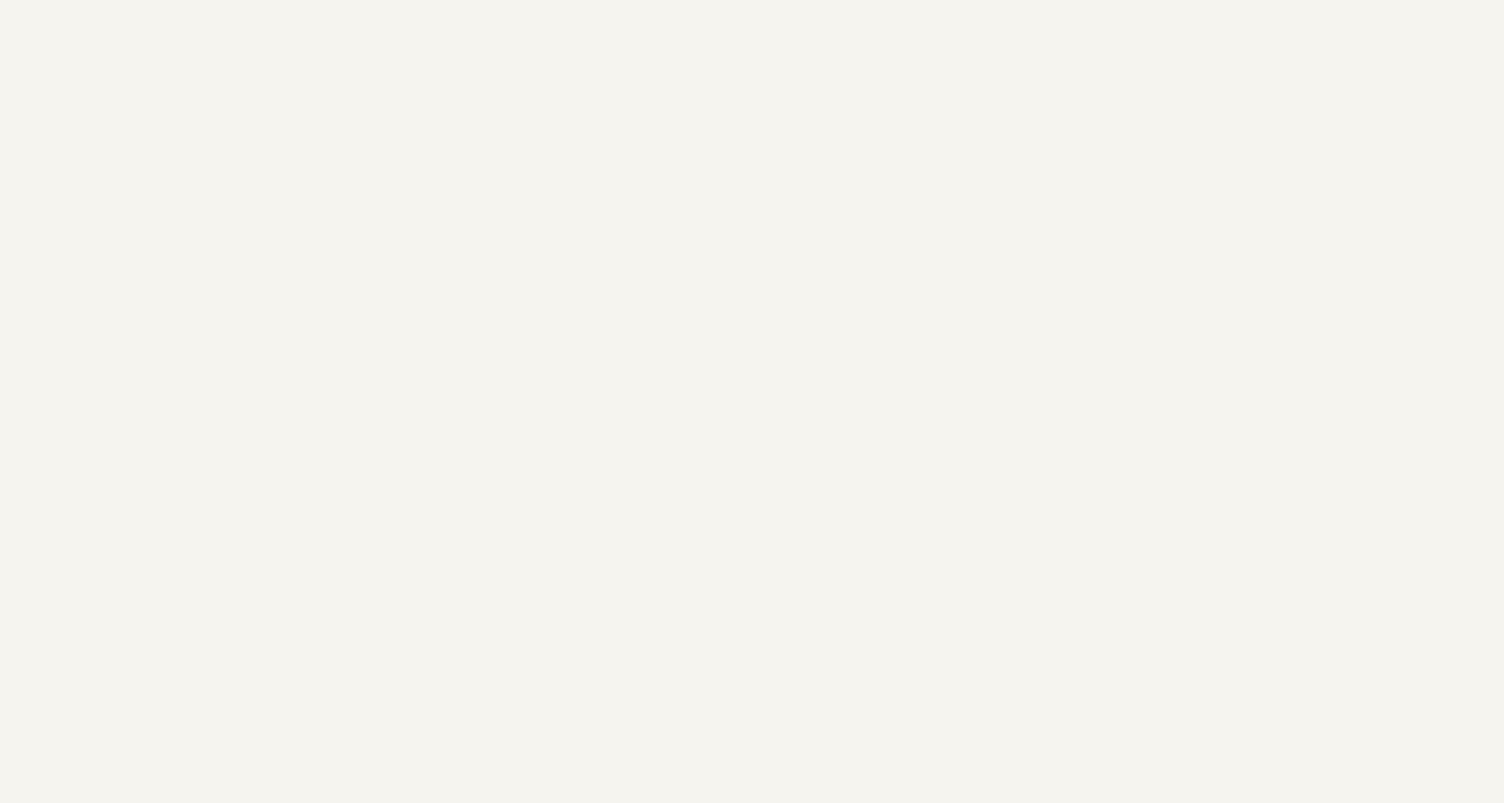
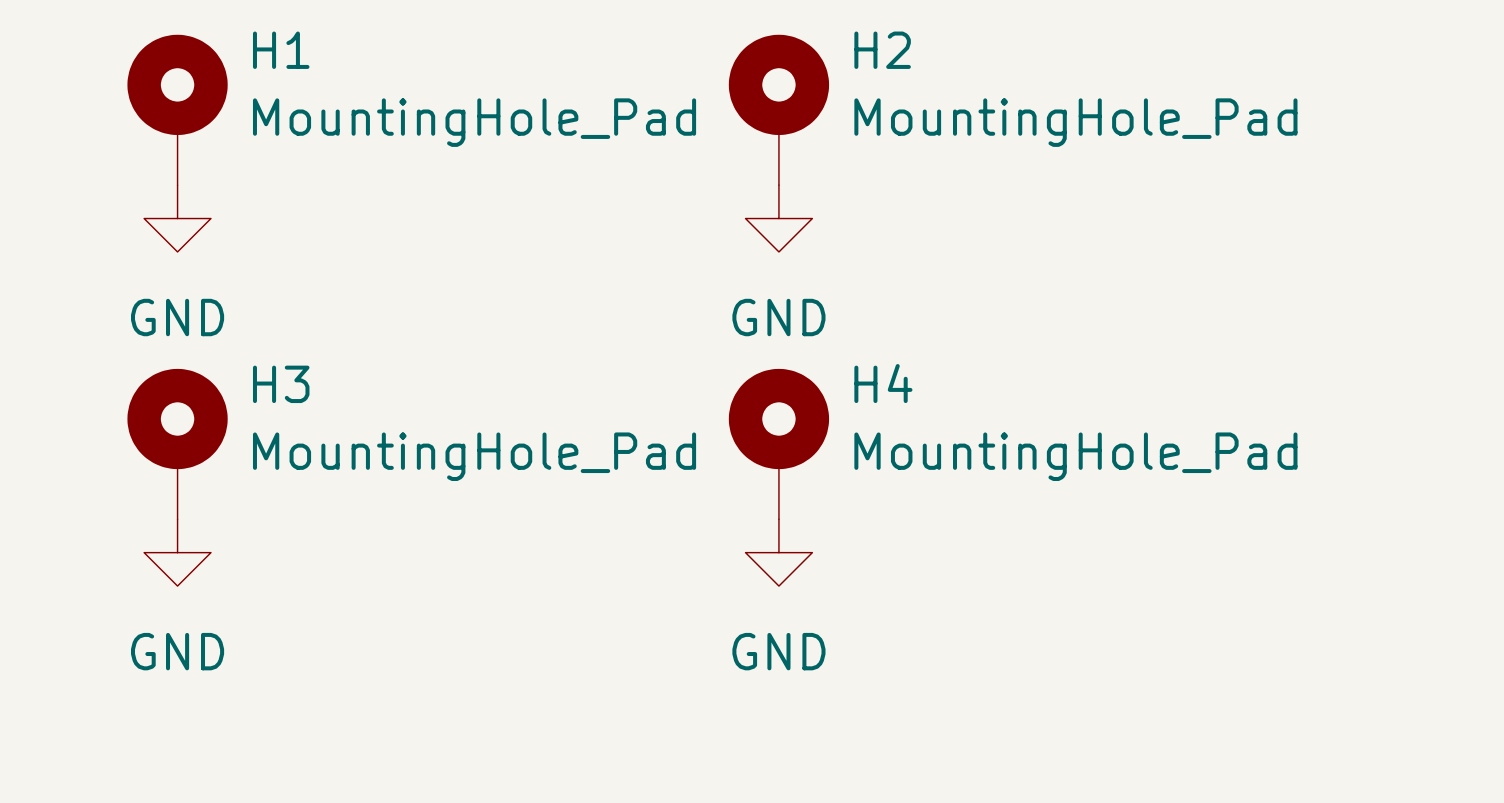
H1: none -> MountingHole_Pad (177, 109)
H2: none -> MountingHole_Pad (778, 109)
power symbol: none -> GND (177, 218)
power symbol: none -> GND (778, 218)
H3: none -> MountingHole_Pad (177, 444)
H4: none -> MountingHole_Pad (778, 444)
power symbol: none -> GND (177, 552)
power symbol: none -> GND (778, 552)

